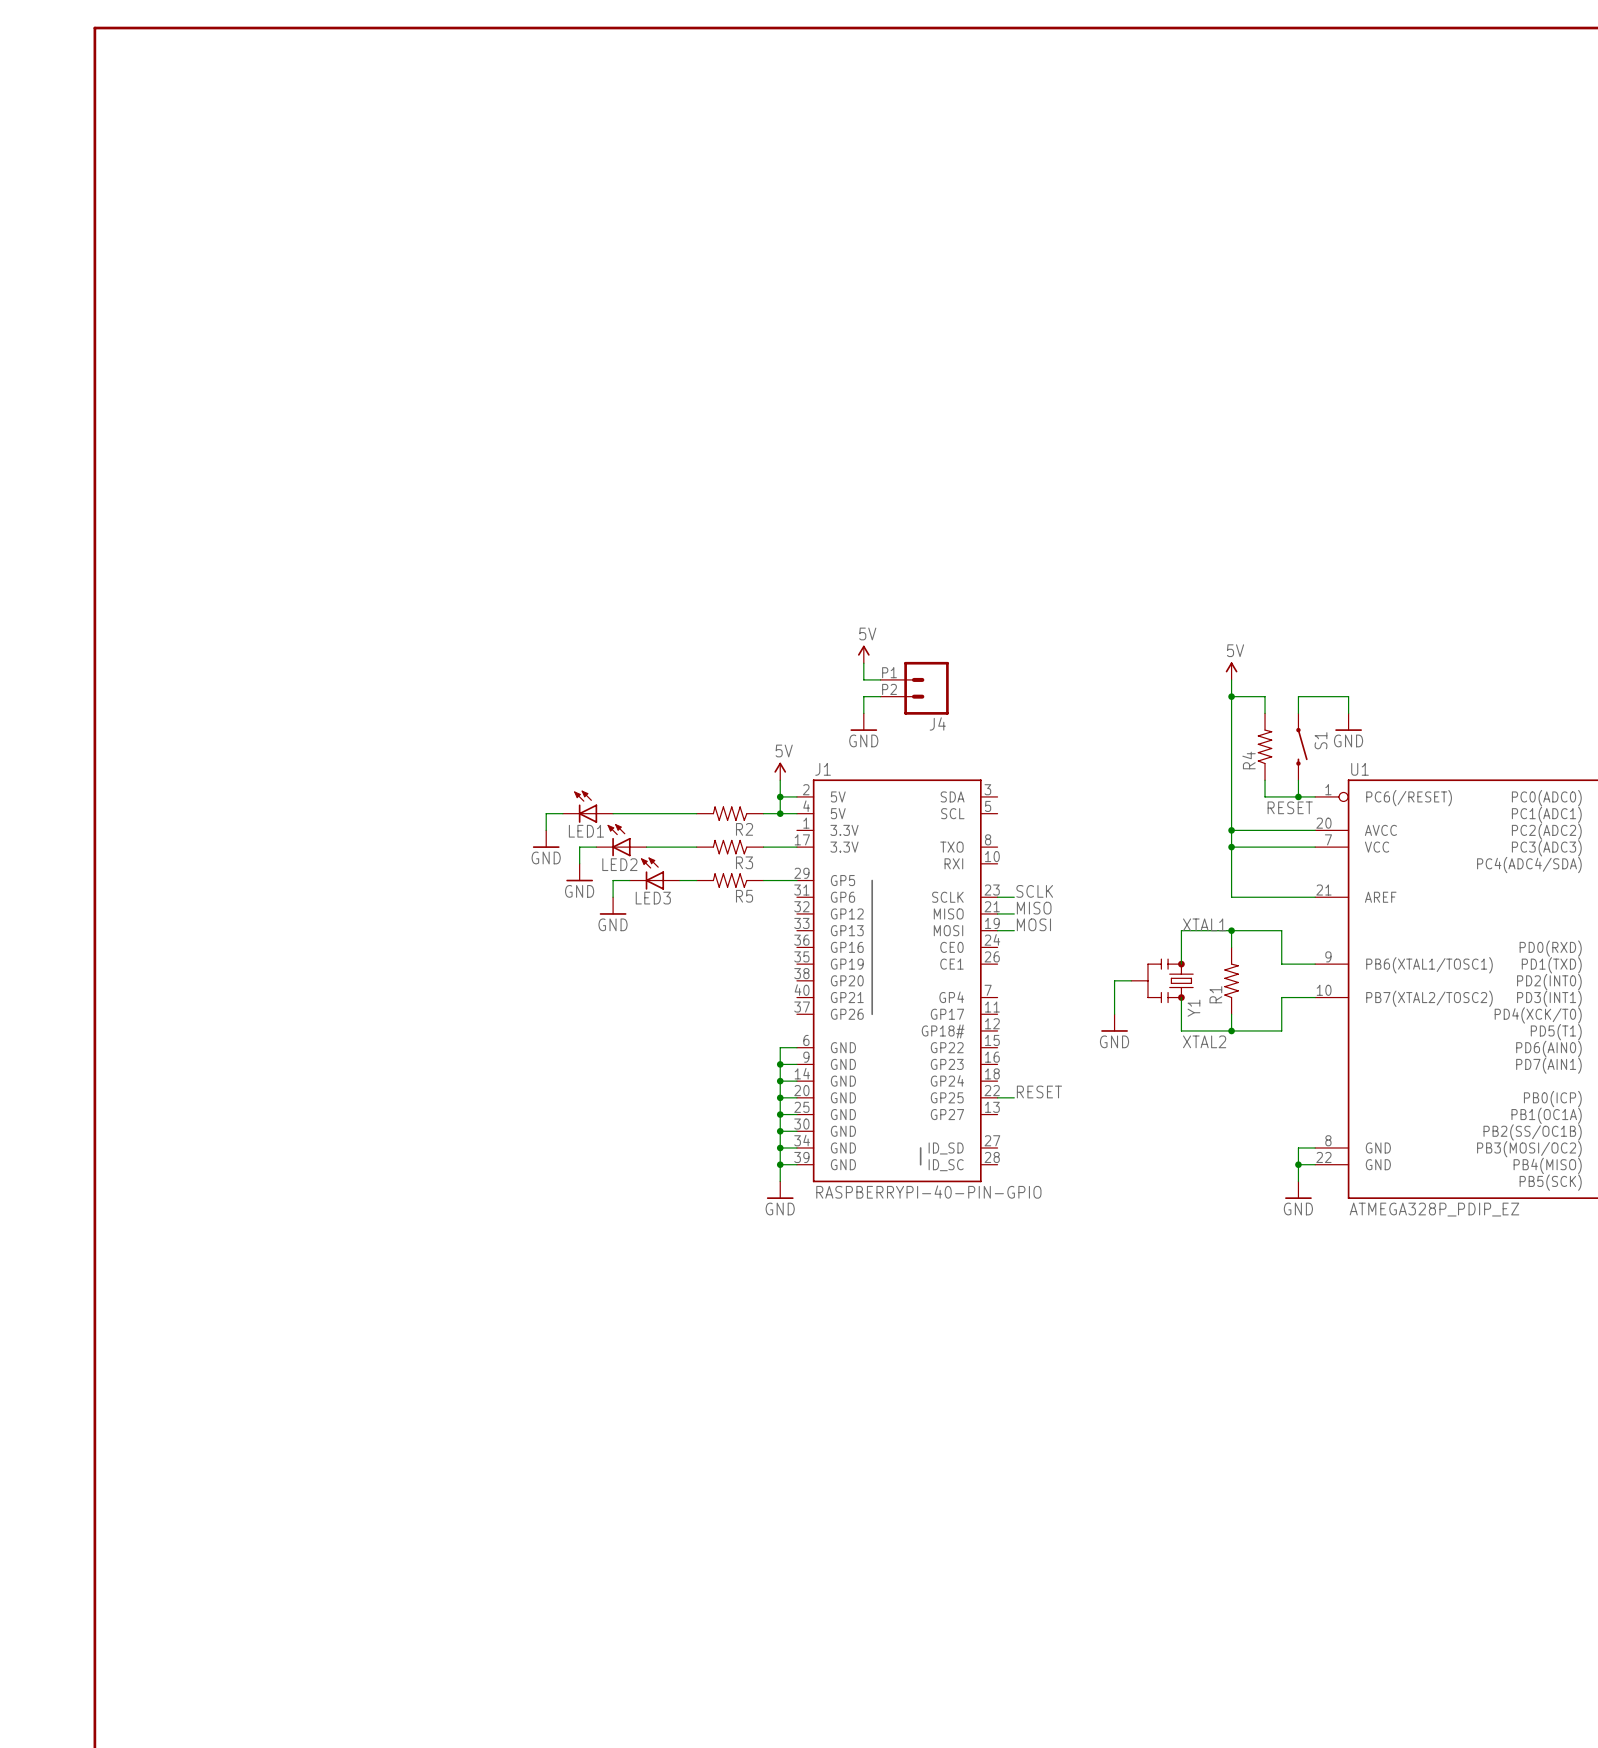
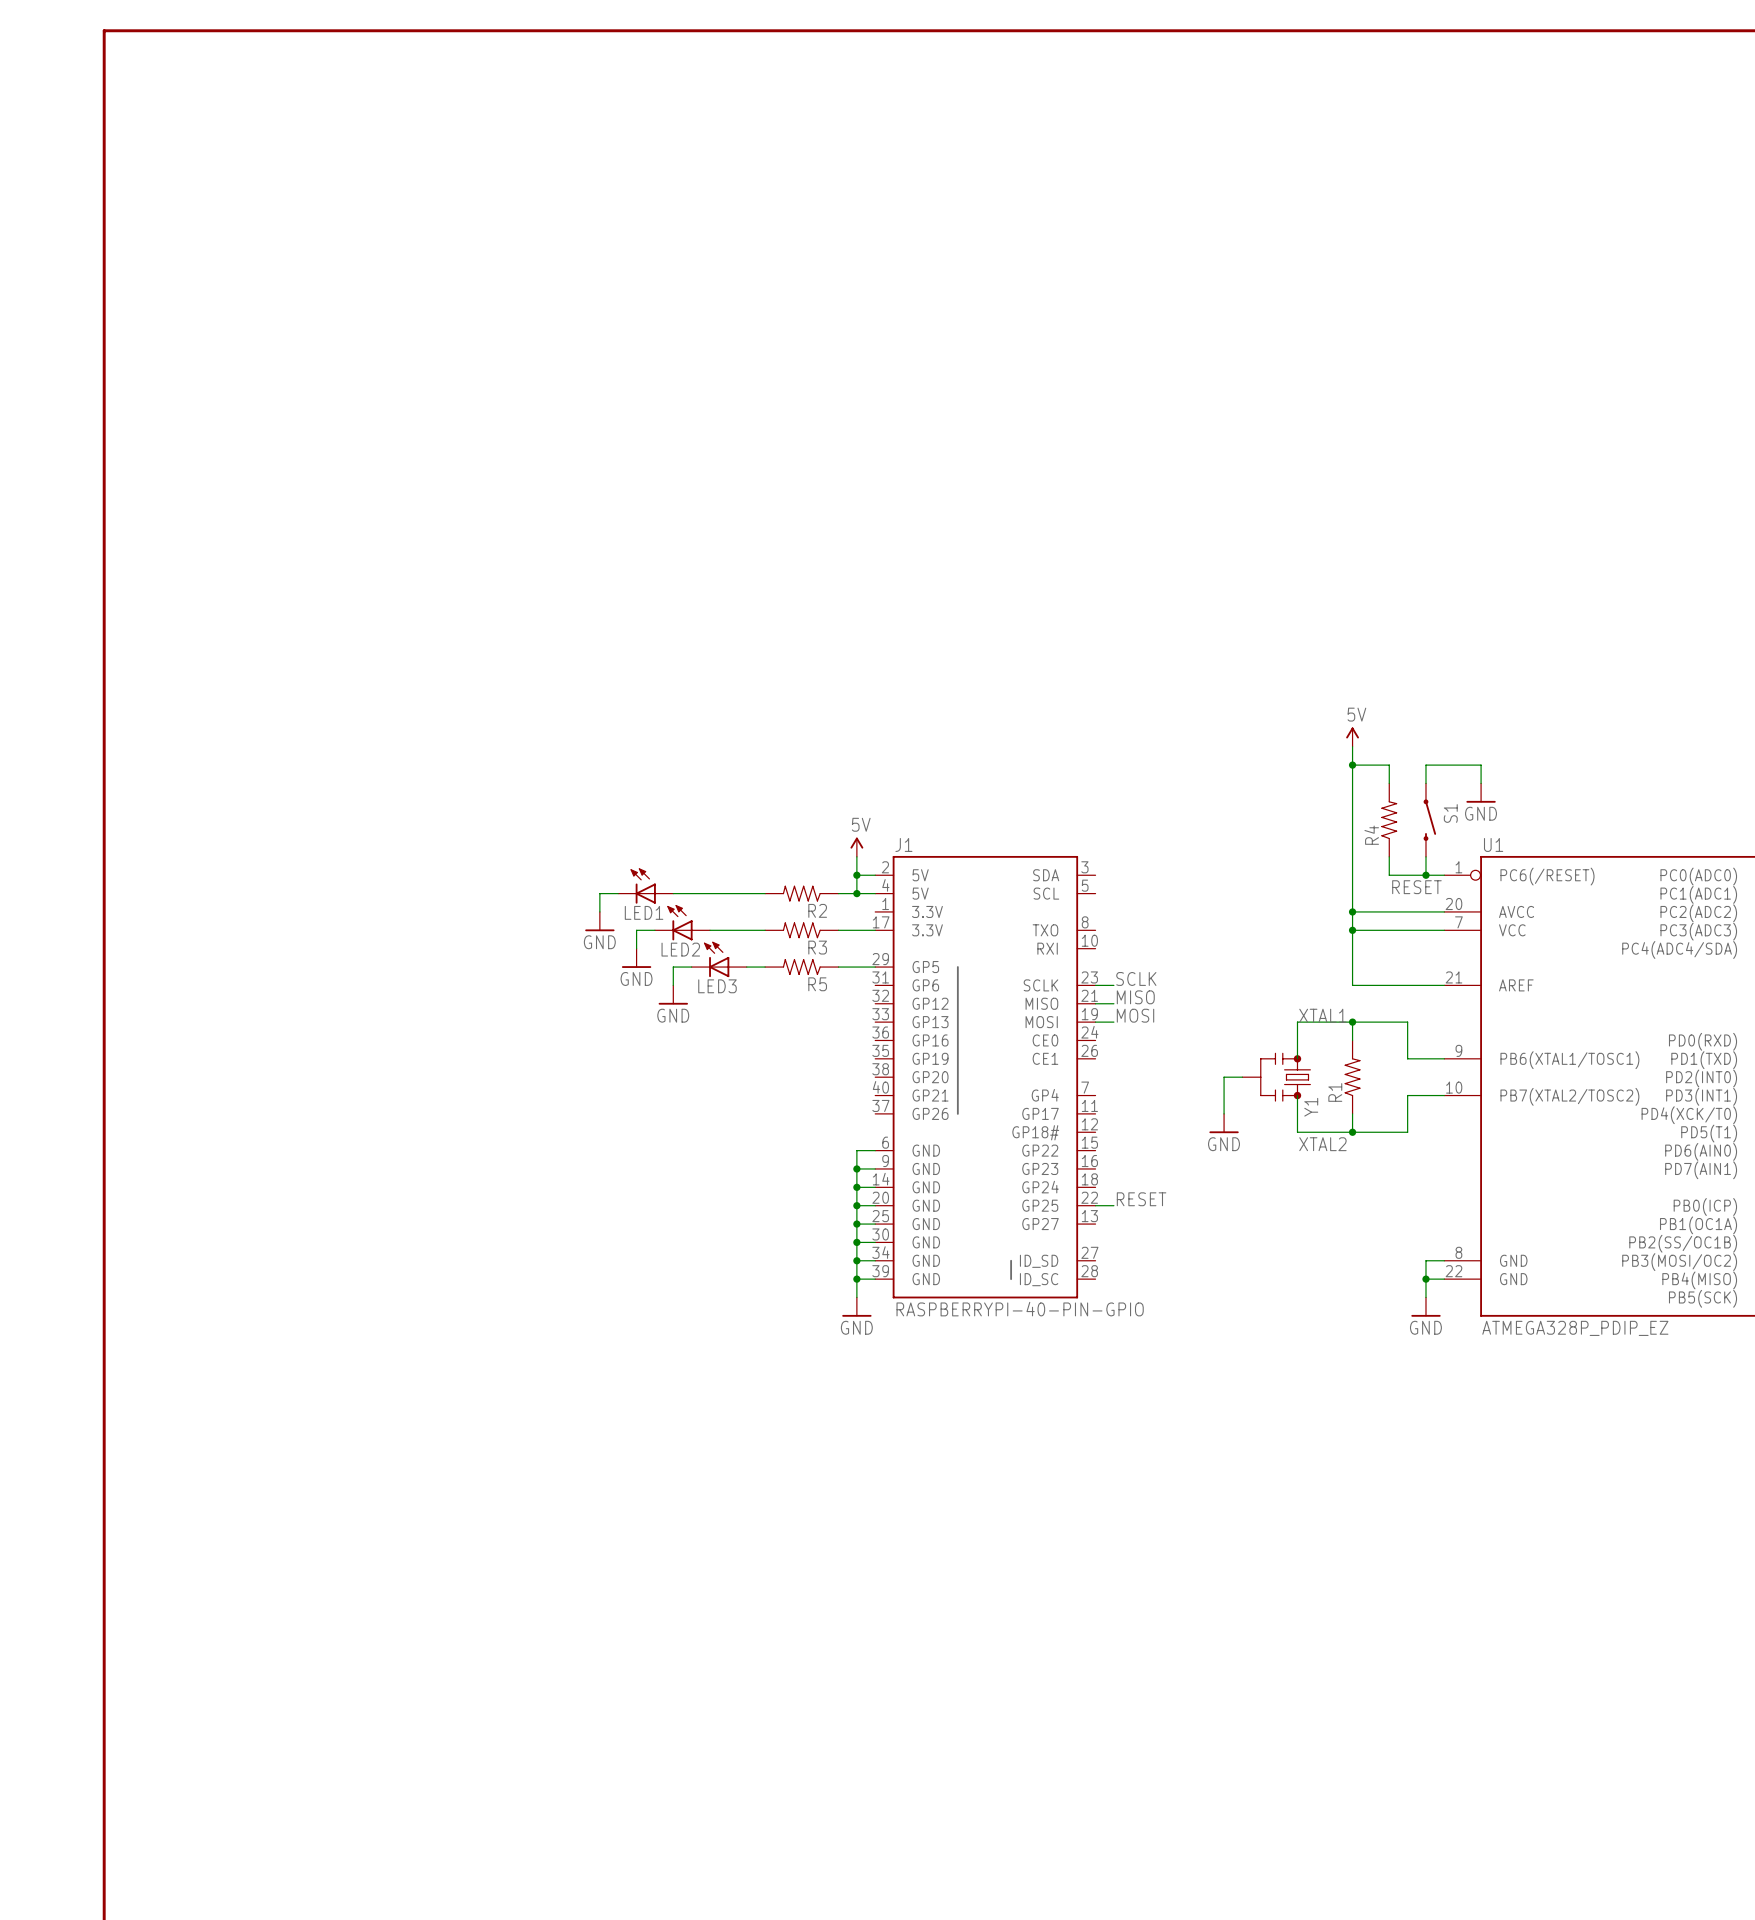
power symbol: 5V (863, 654) -> none
wire: (863, 663) (863, 679) (880, 679) -> none
J4: (914, 688) -> none
wire: (880, 696) (863, 696) (863, 713) -> none
power symbol: GND (863, 722) -> none

